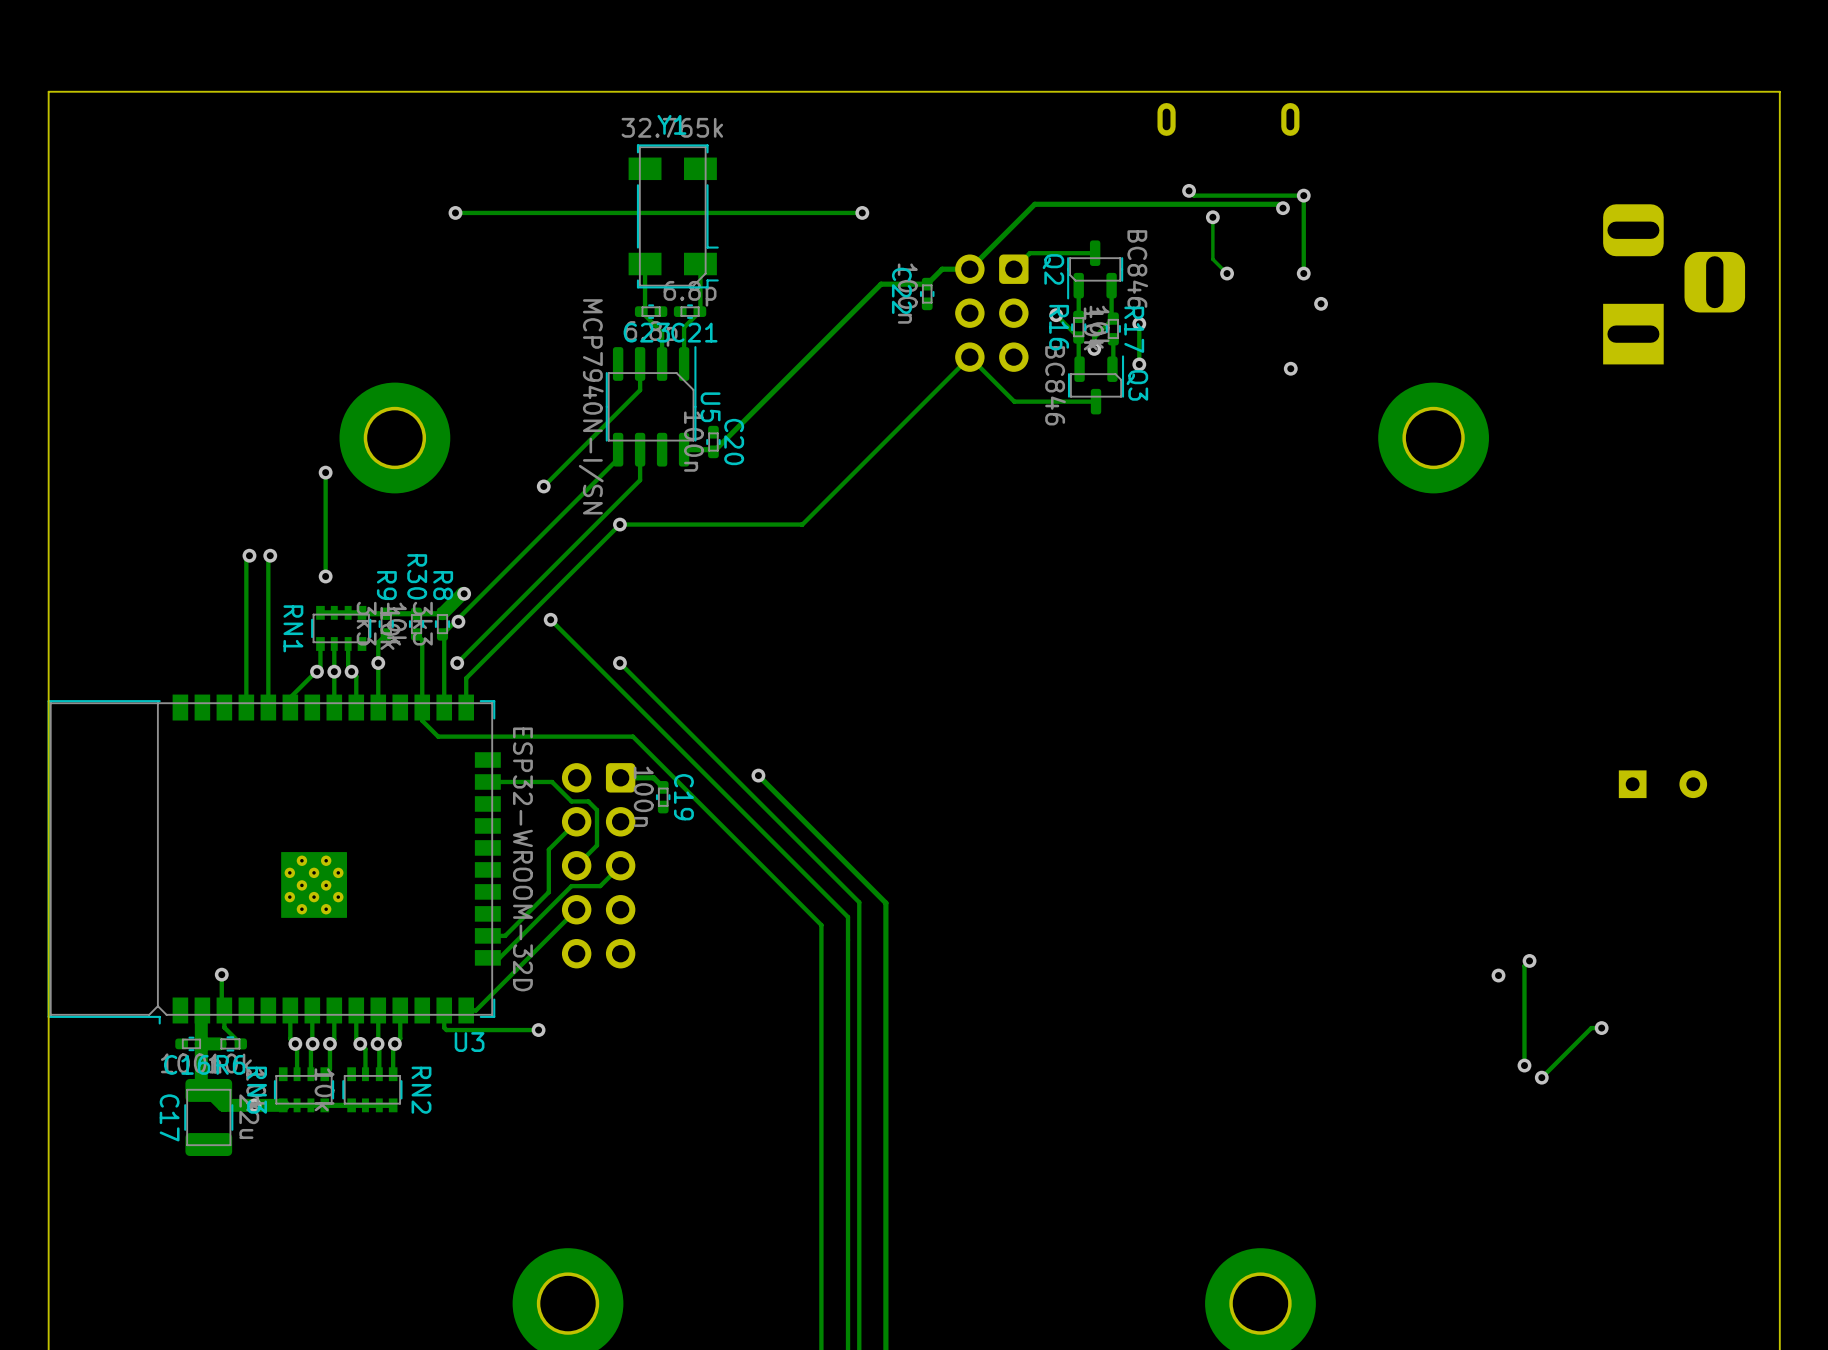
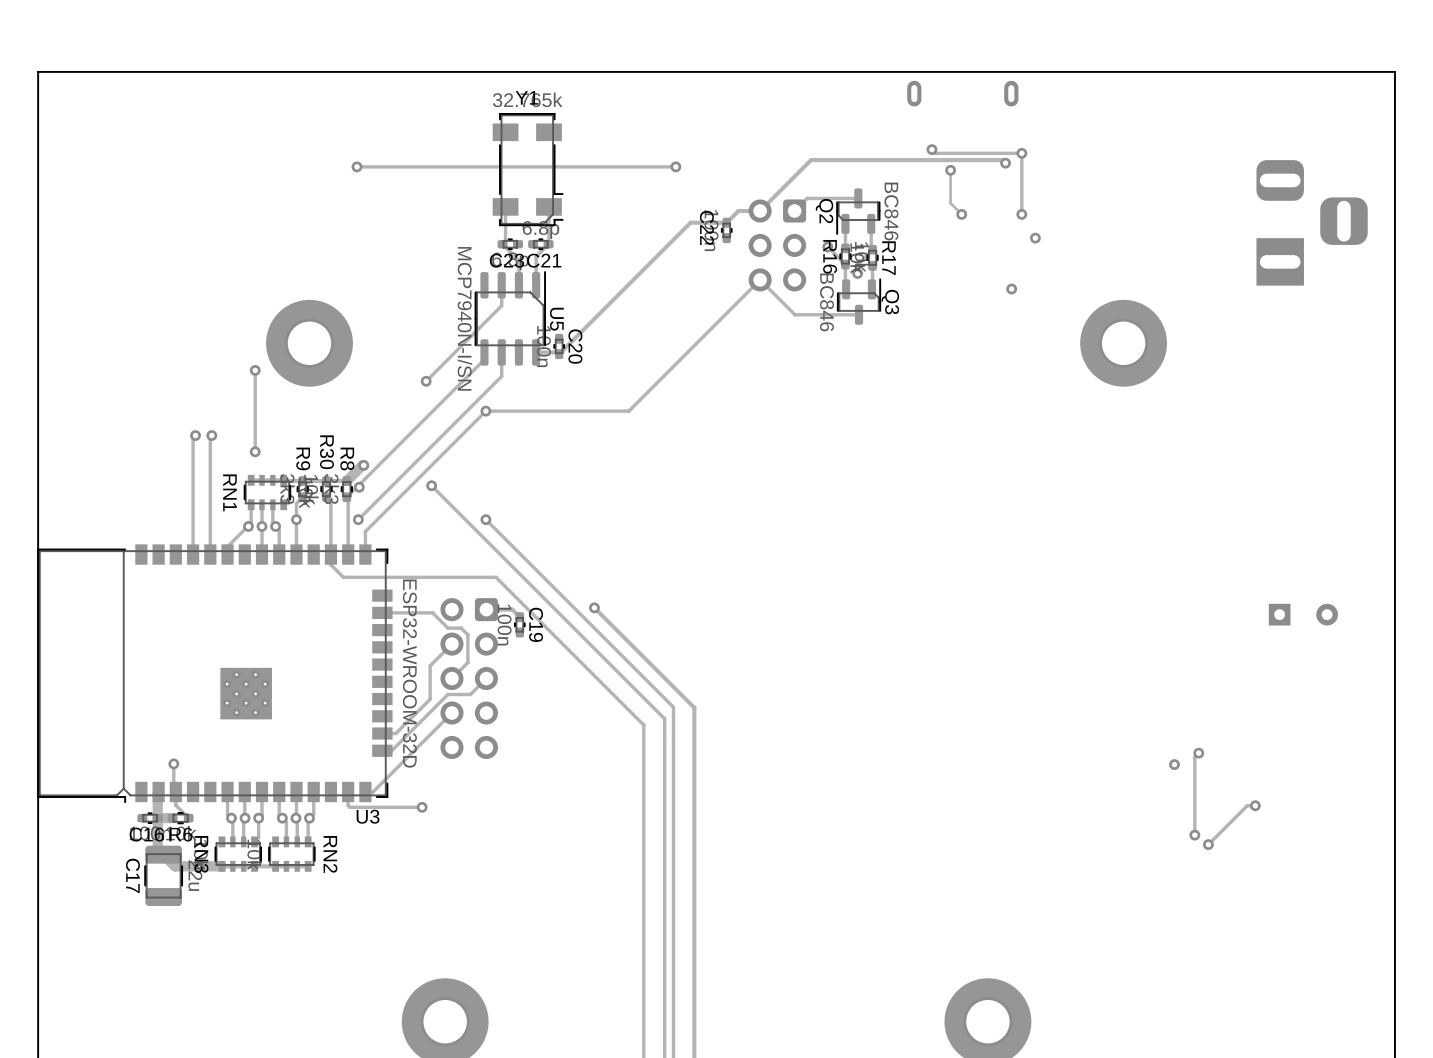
track: (1139, 323) (1139, 364) -> none
via: (1139, 323) -> none
via: (1139, 364) -> none

